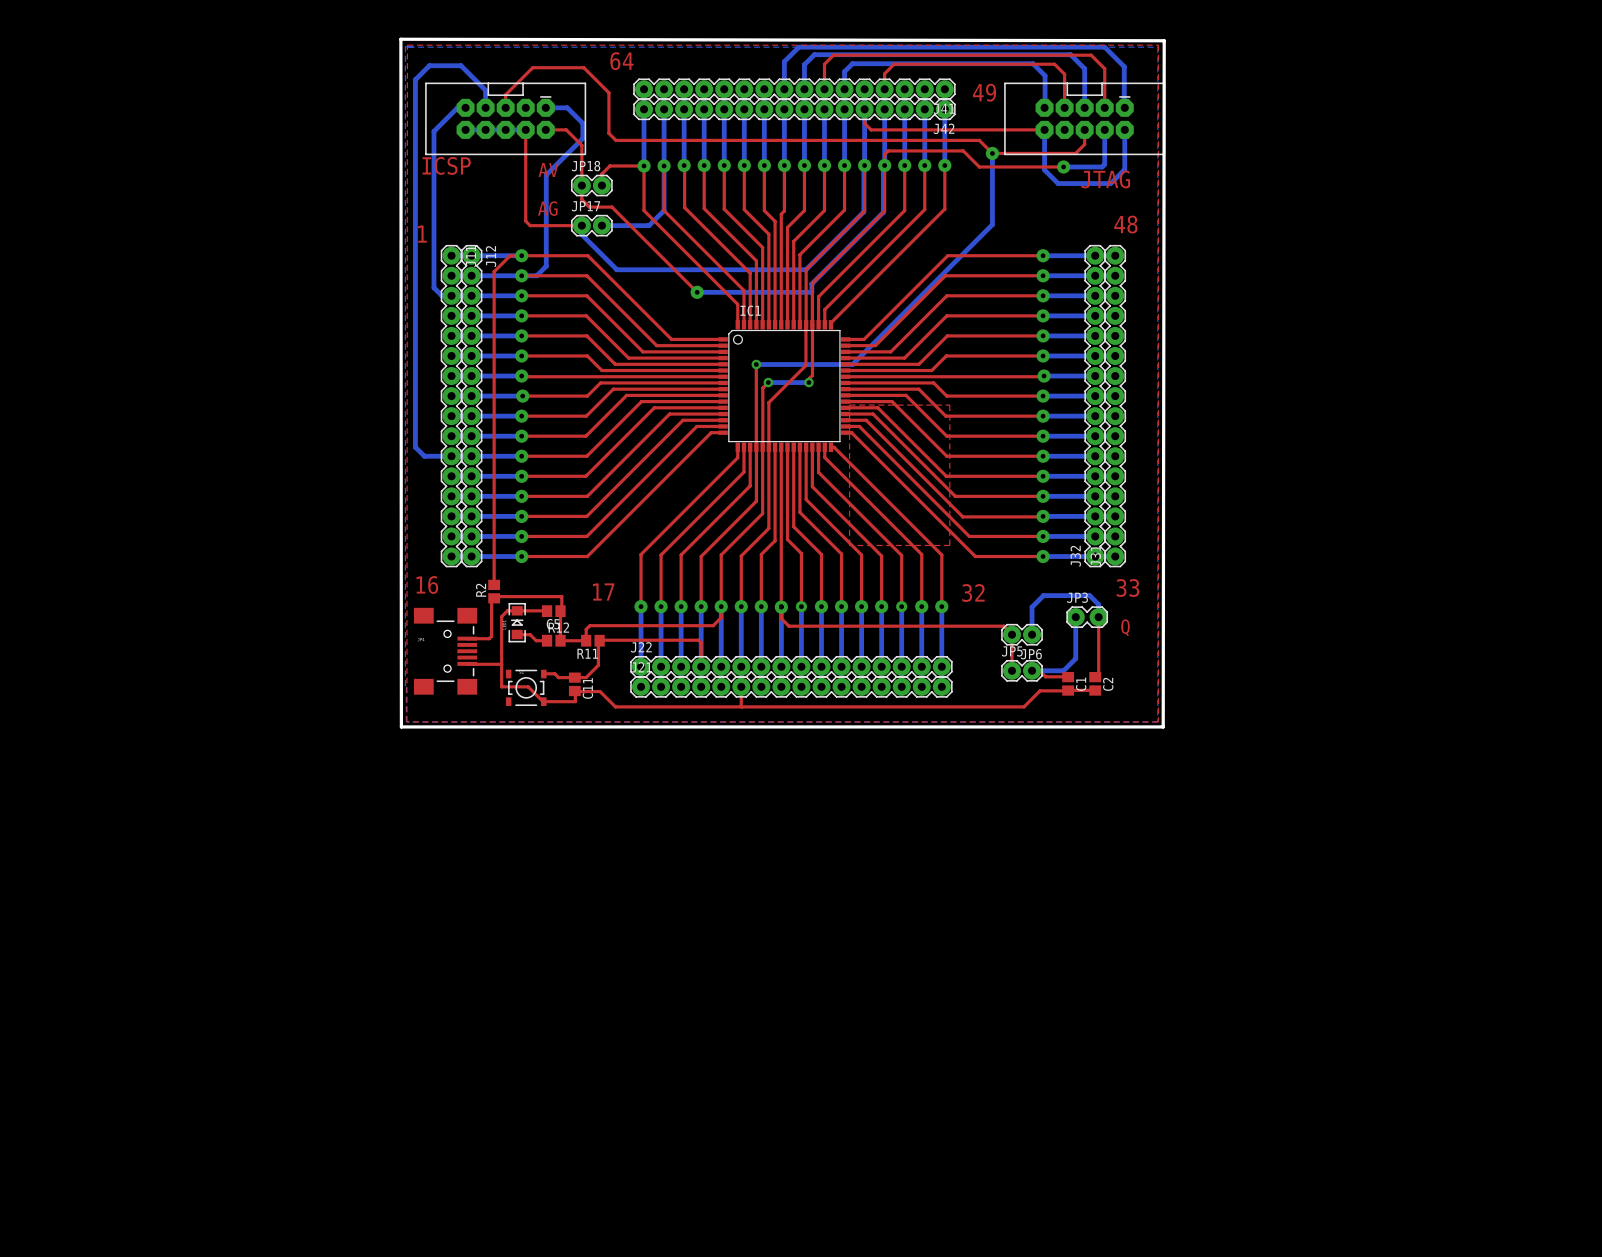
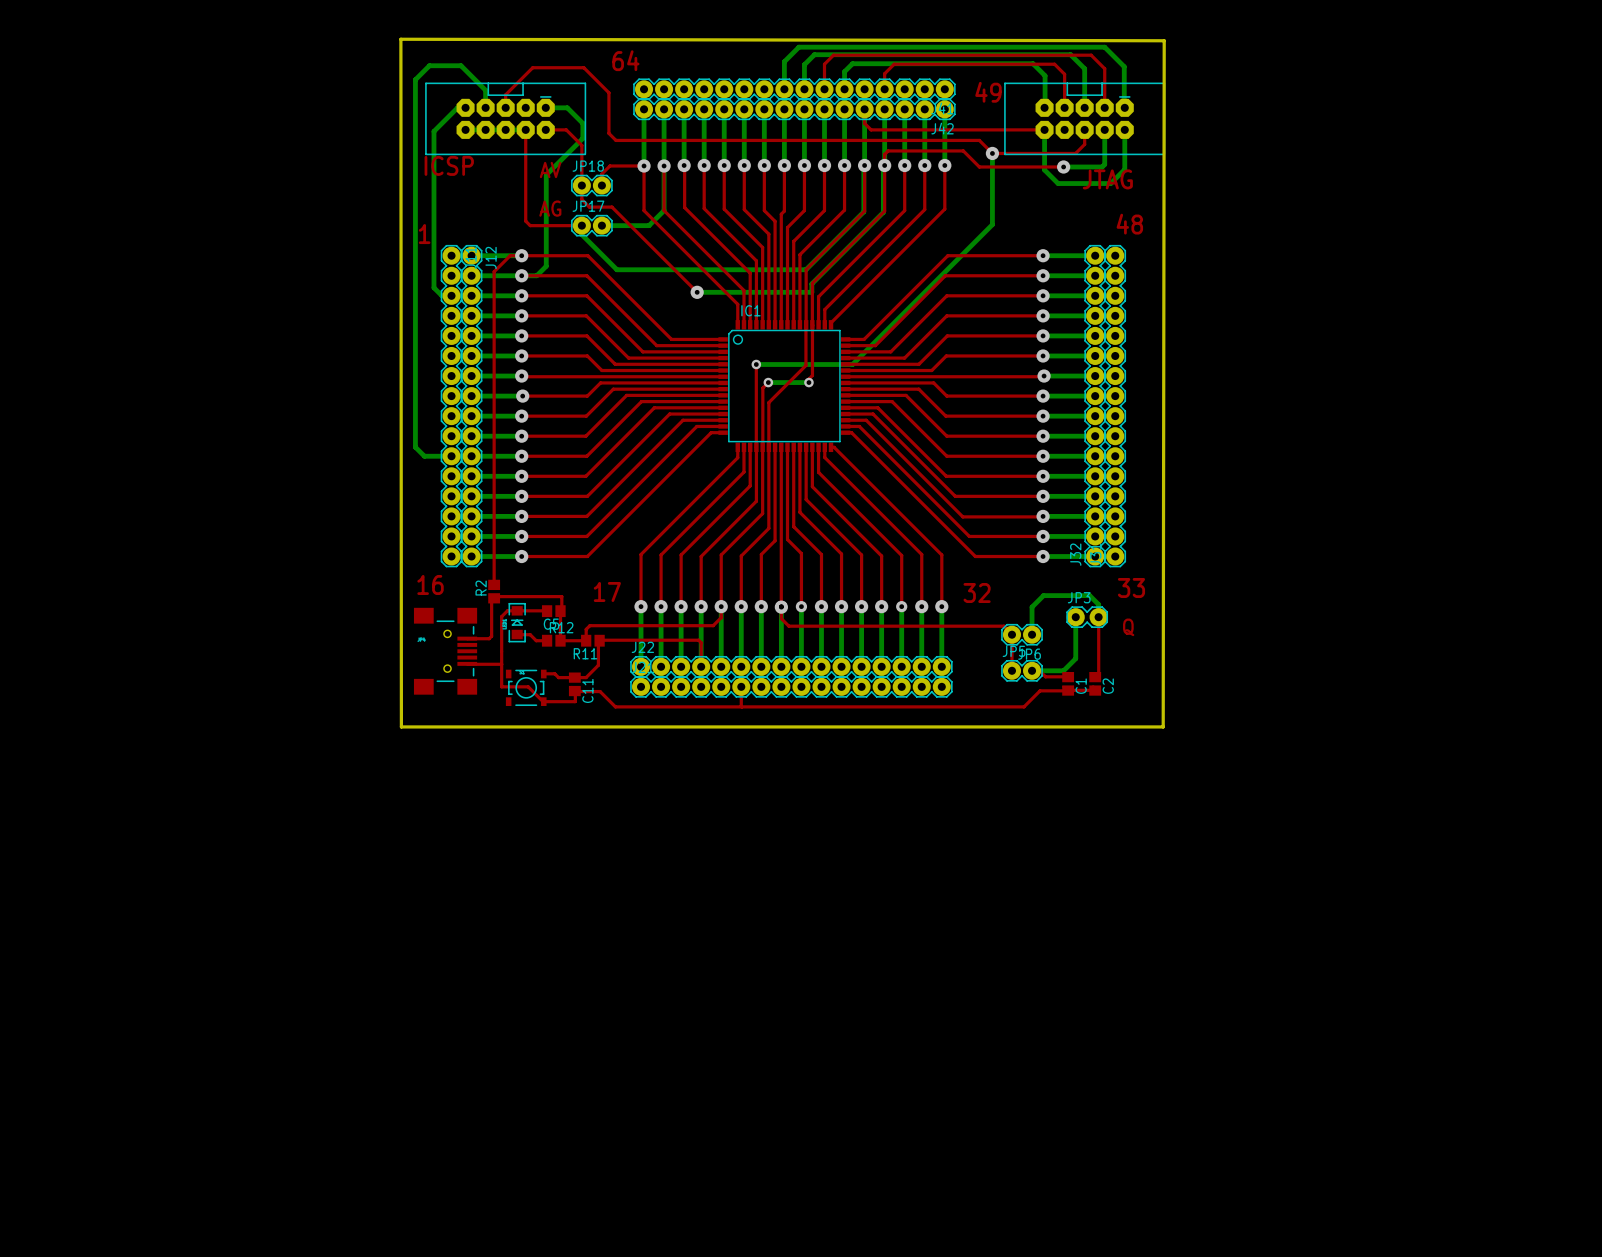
top zone outline: (407, 45) (1158, 45) (1158, 721) (406, 721) (407, 45) -> none
bottom zone outline: (405, 46) (406, 721) (1157, 721) (1157, 47) (405, 46) -> none
top zone outline: (849, 405) (949, 405) (949, 545) (849, 545) (849, 405) -> none

